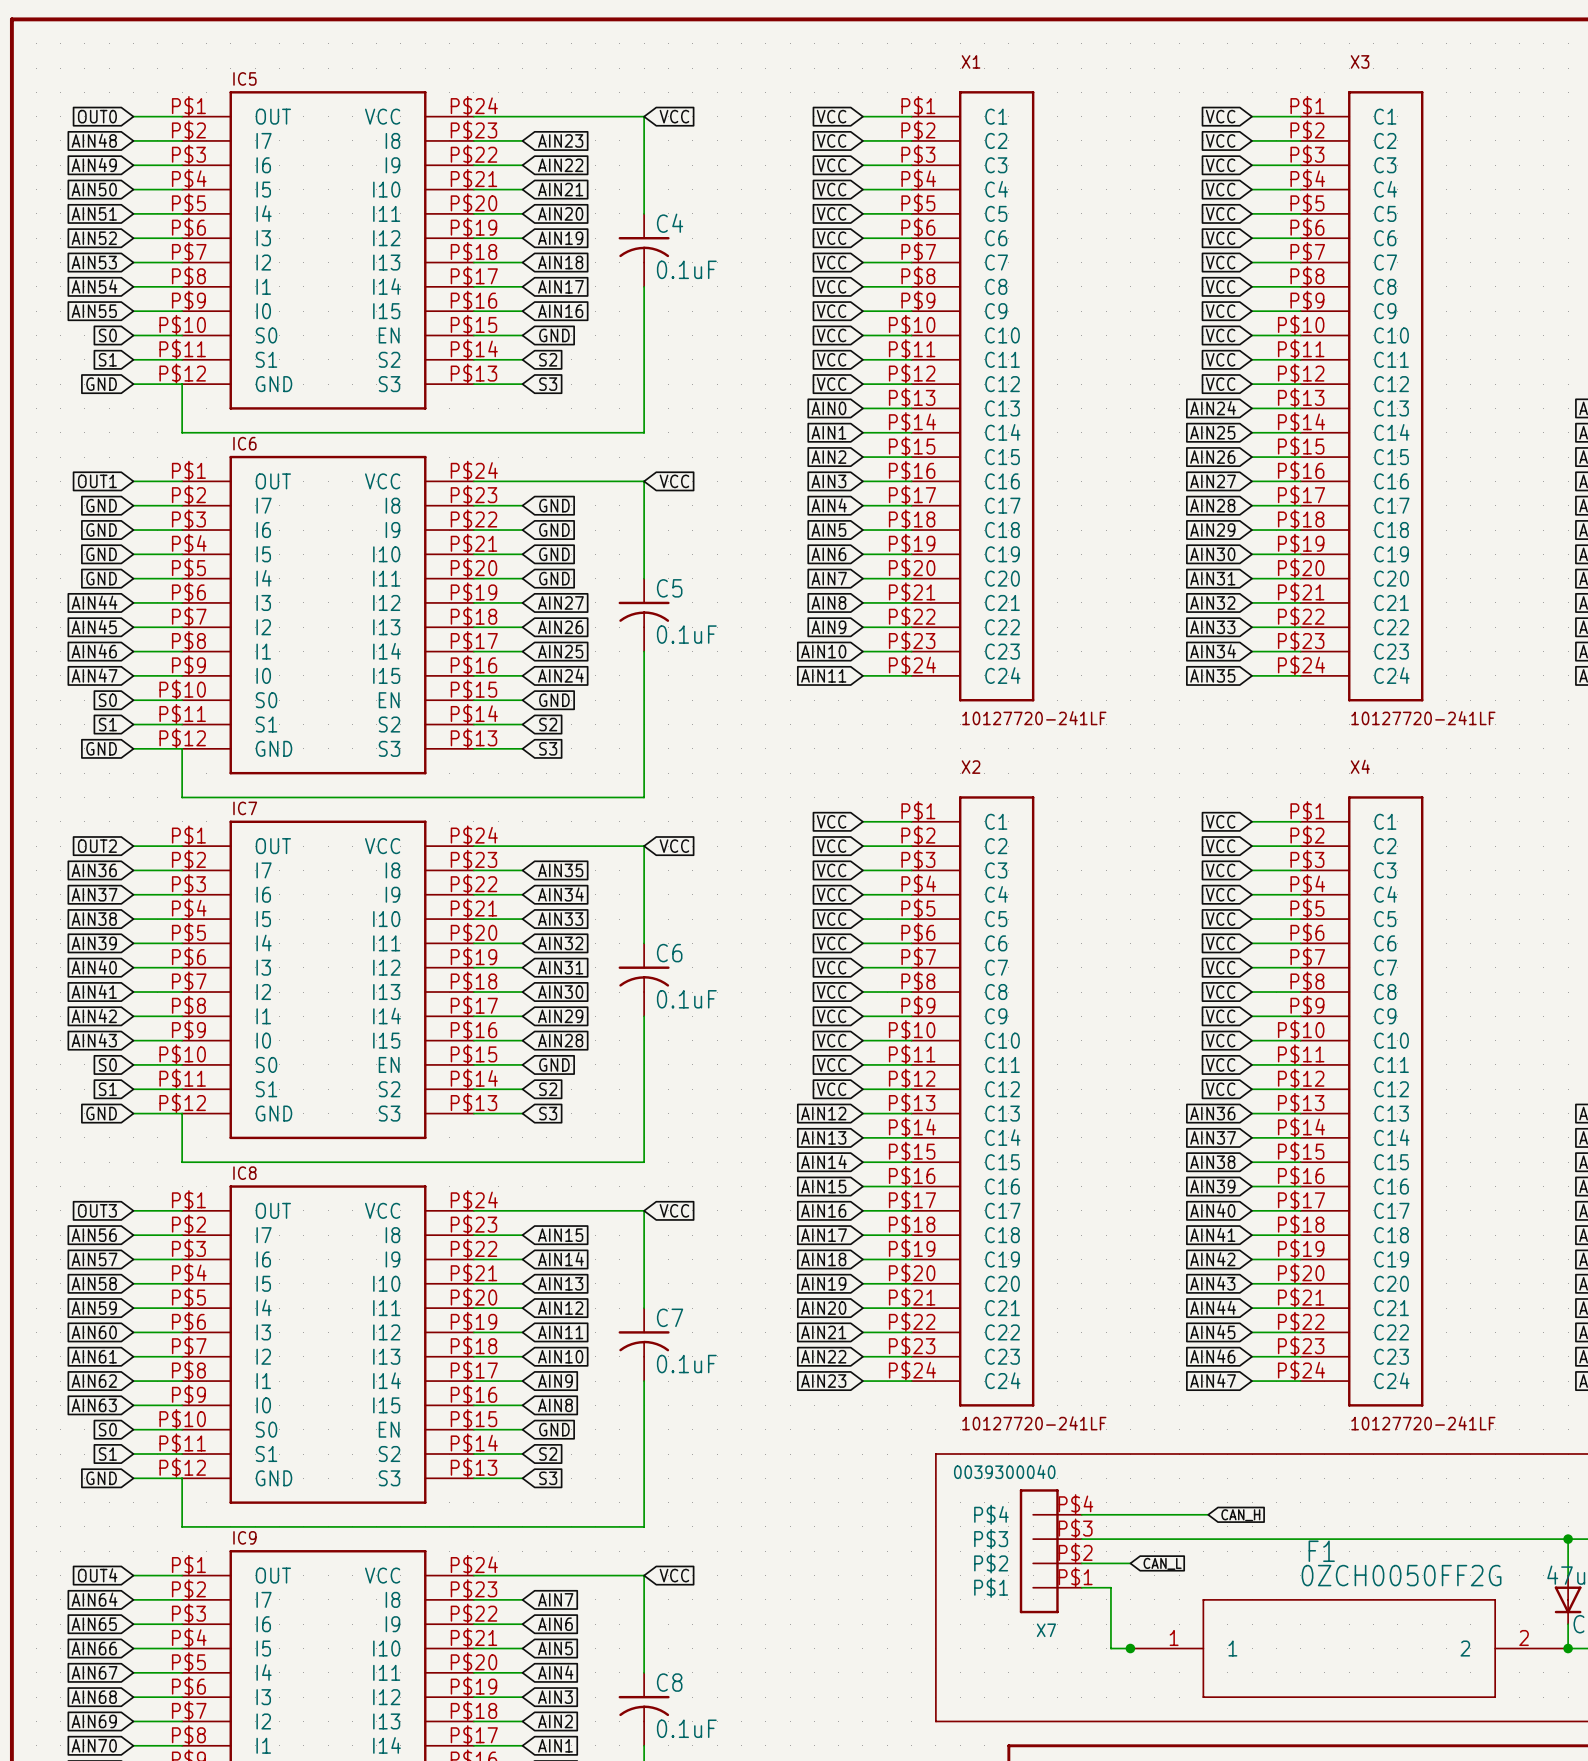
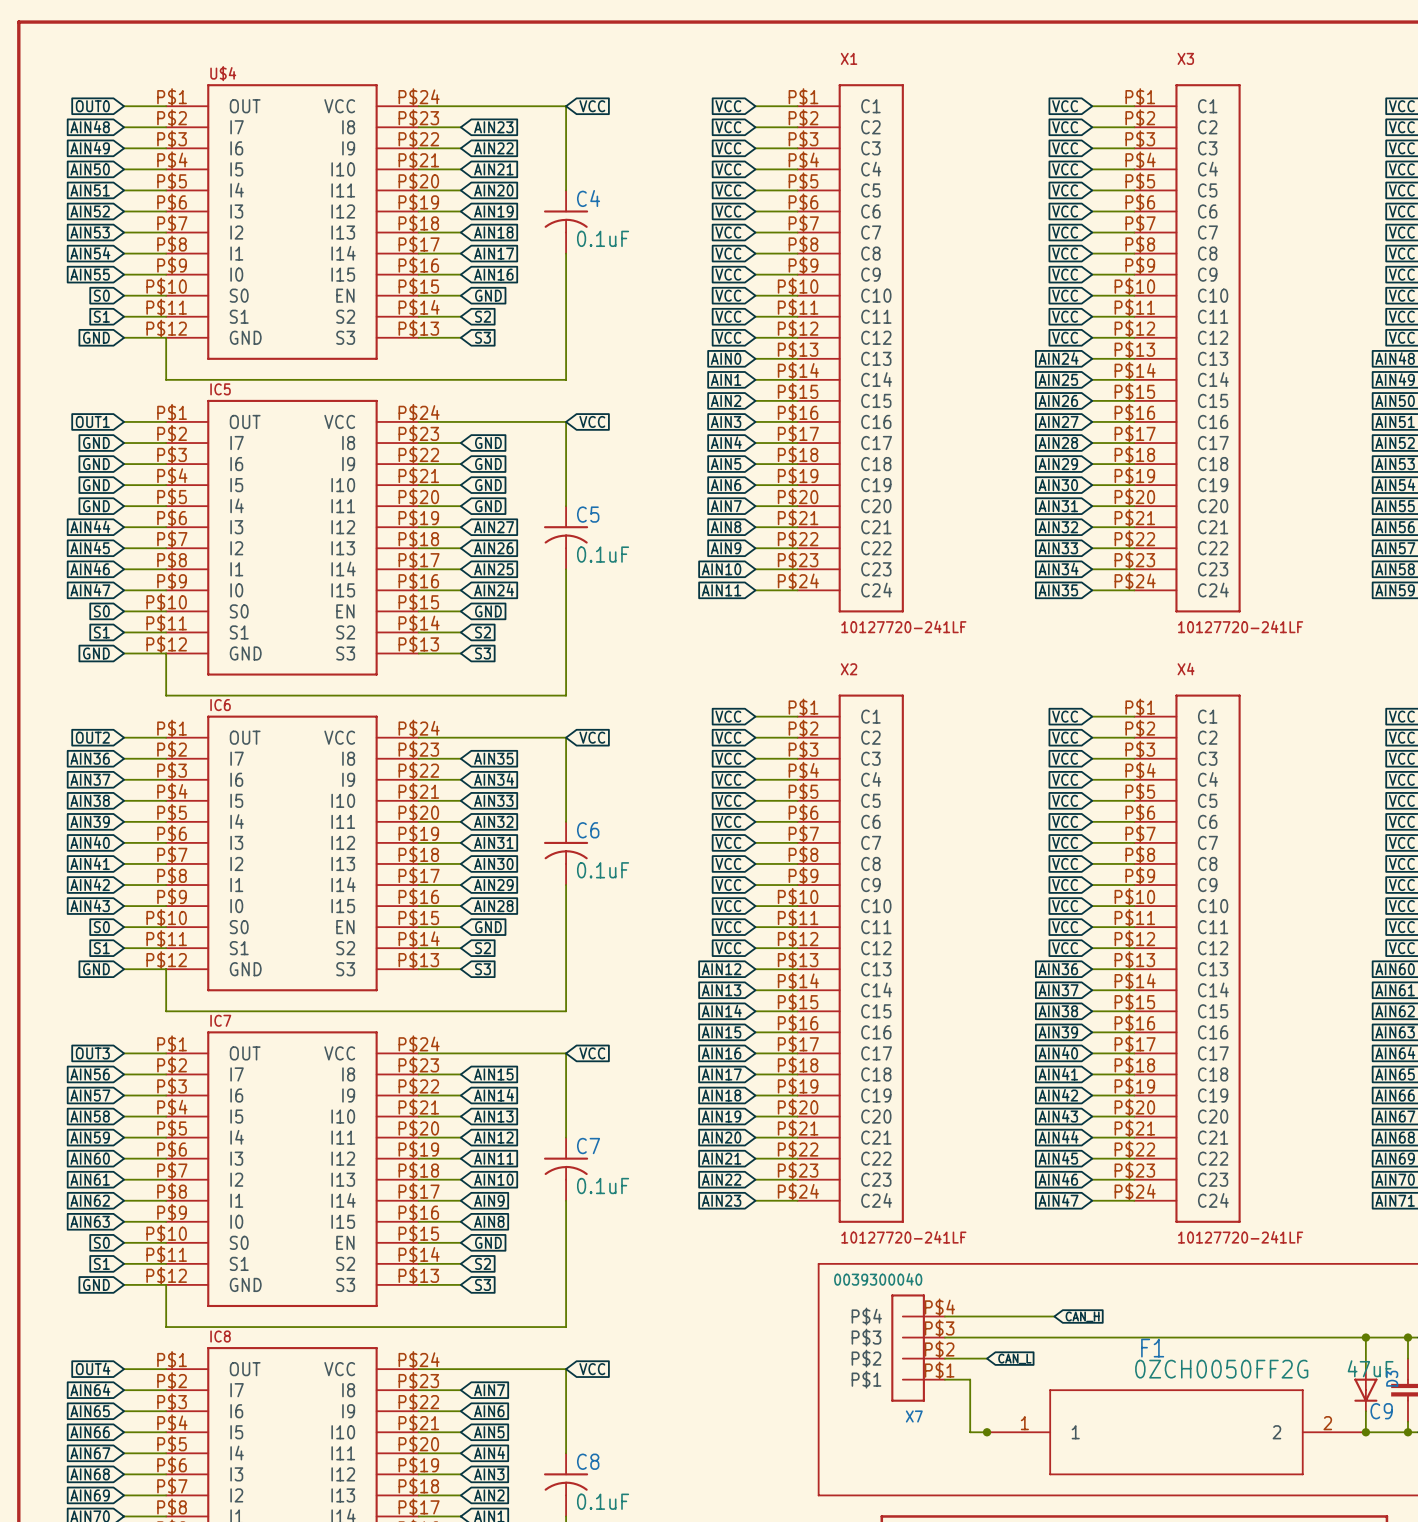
IC5 name: IC5 (244, 78) -> U$4 (223, 73)
IC6 name: IC6 (244, 443) -> IC5 (220, 389)
IC7 name: IC7 (245, 808) -> IC6 (220, 705)
IC8 name: IC8 (244, 1173) -> IC7 (220, 1020)
IC9 name: IC9 (244, 1537) -> IC8 (220, 1336)

